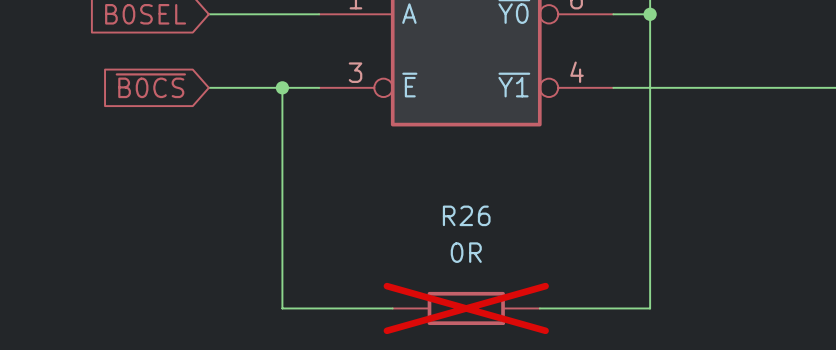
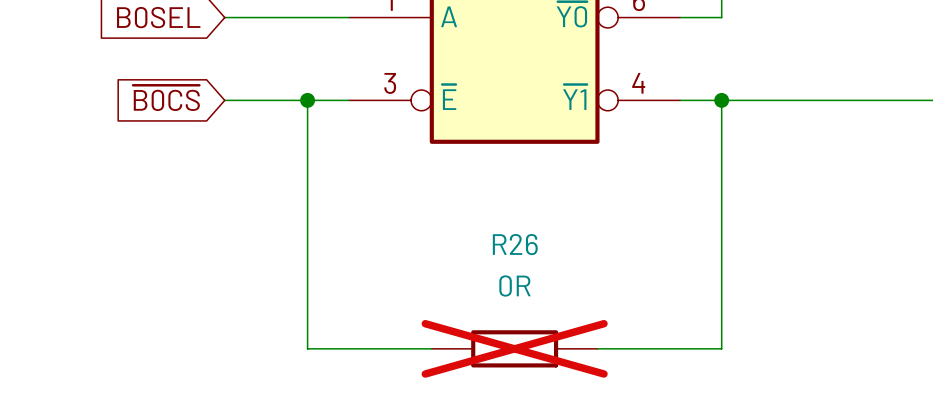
wire: (650, 14) (650, 87) -> none
junction position: (650, 14) -> (721, 100)

